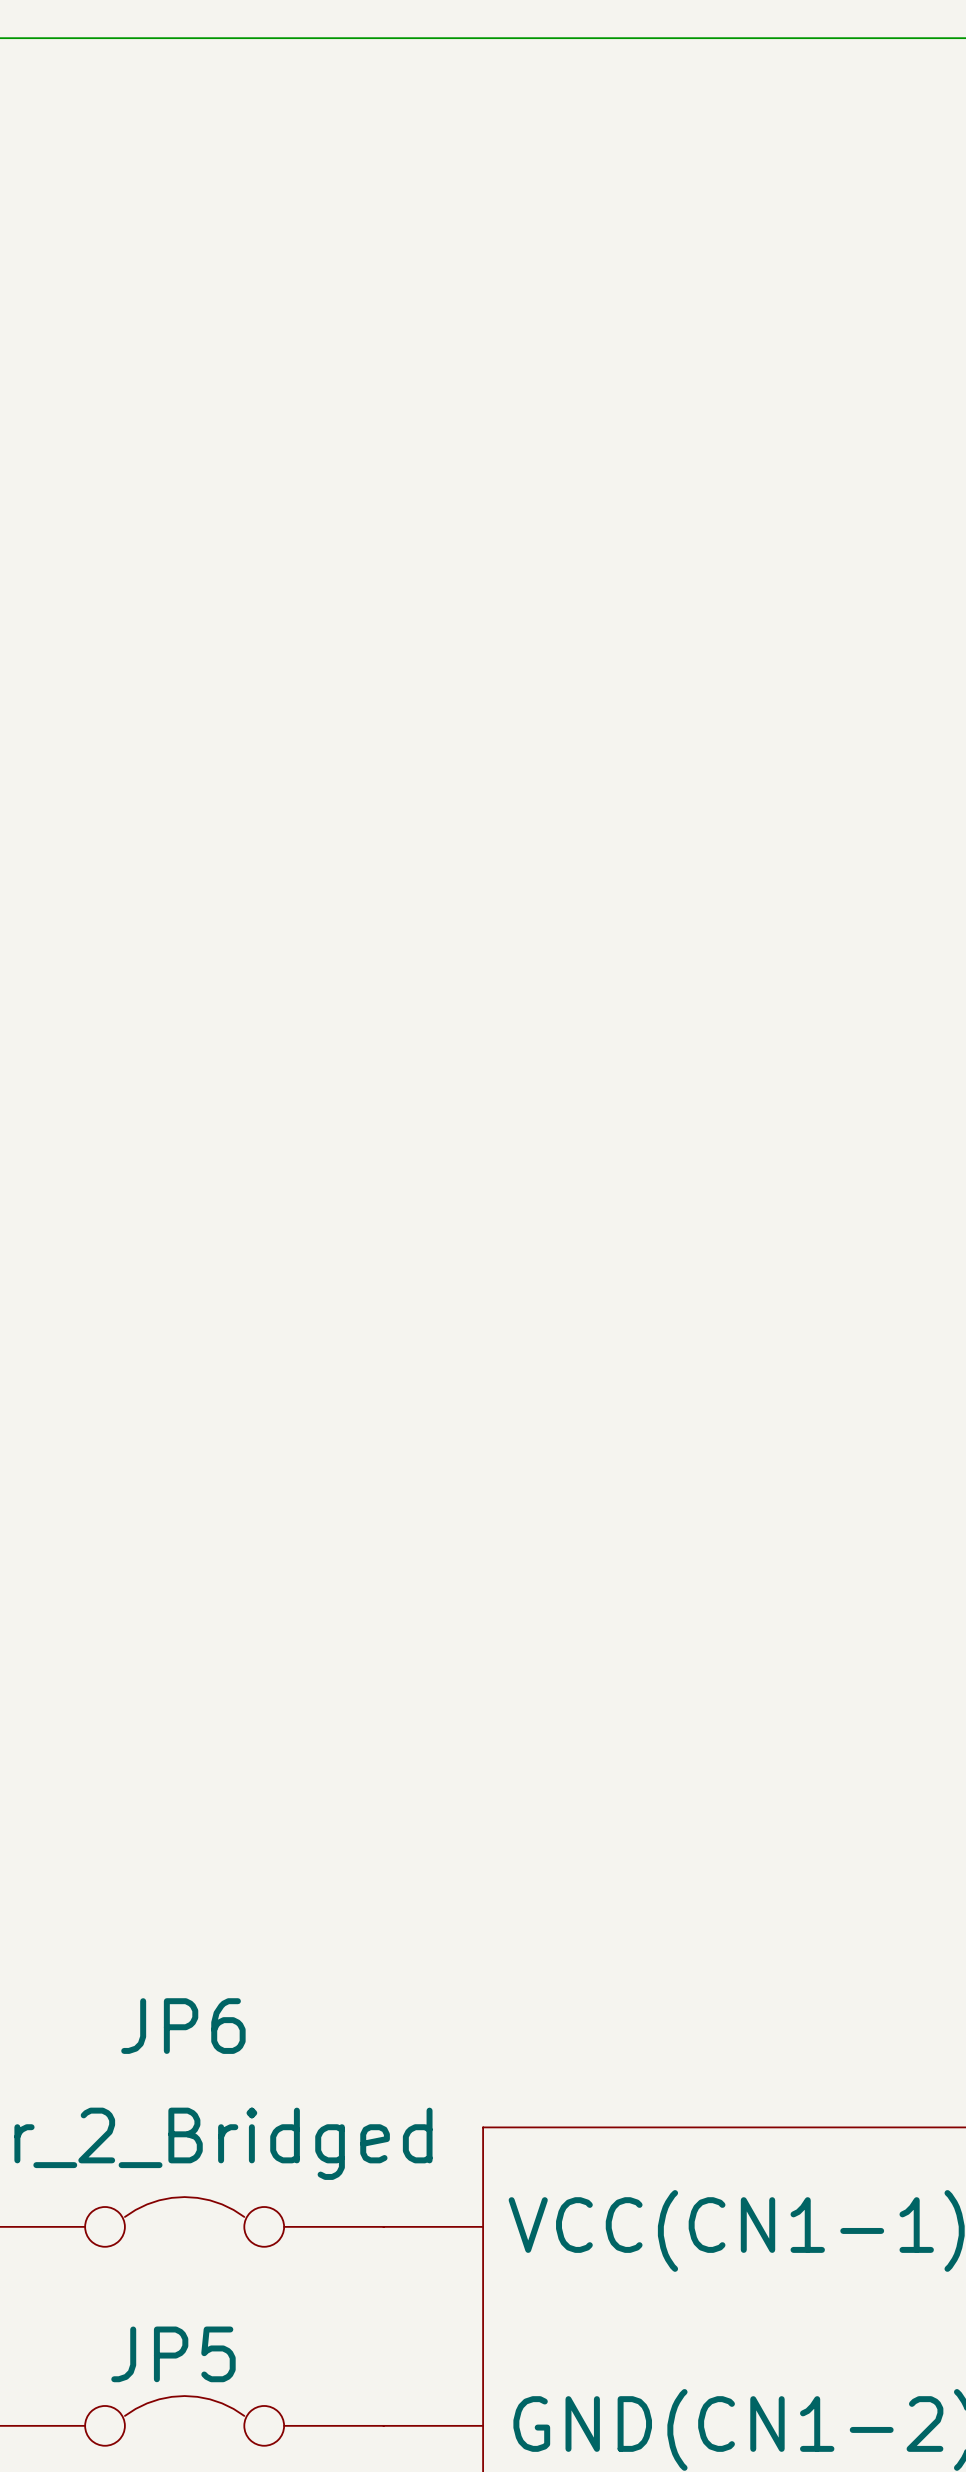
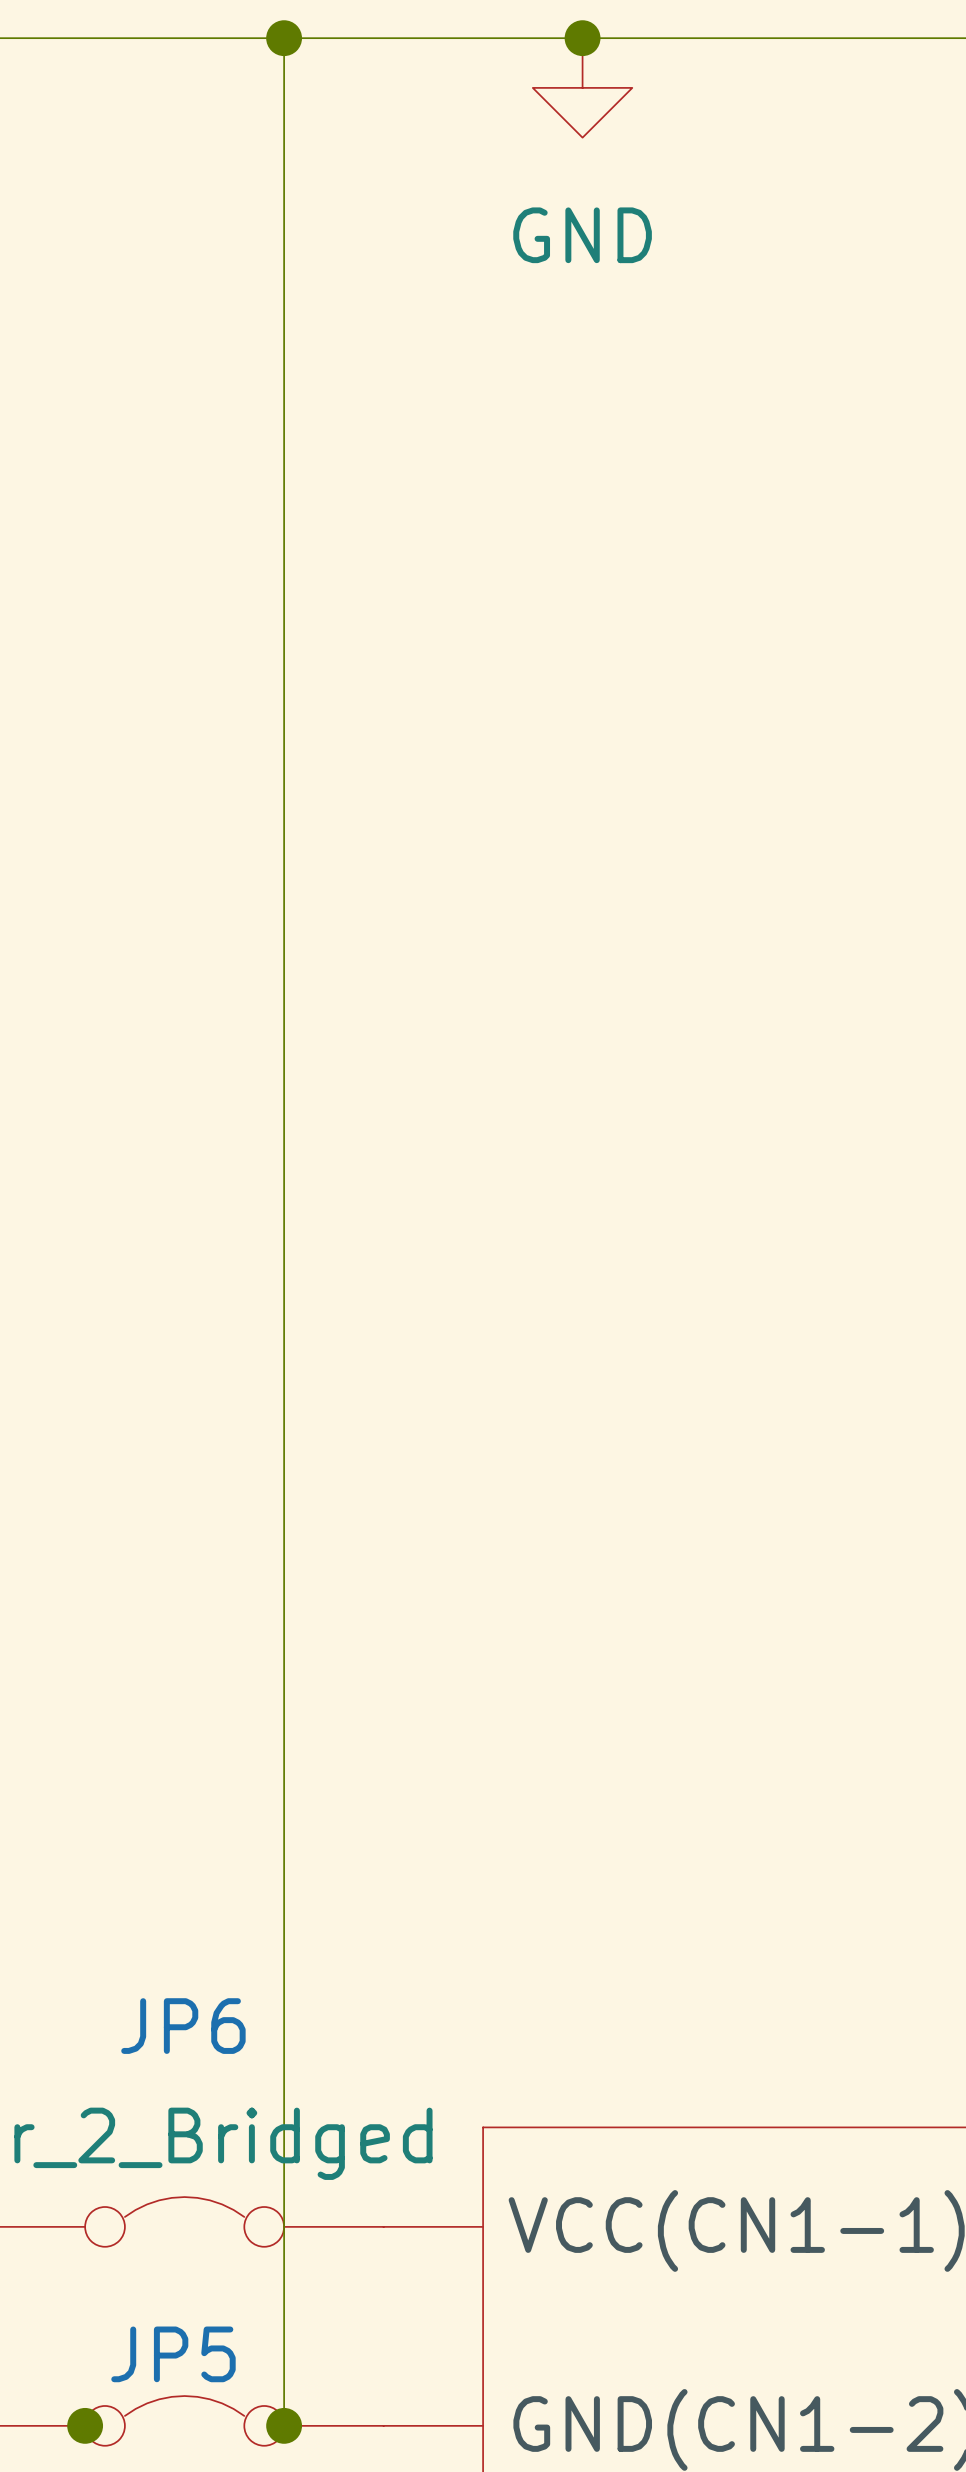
wire: none -> (284, 38) (284, 2425)
junction: none -> (284, 38)
junction: none -> (582, 38)
power symbol: none -> GND (582, 87)
junction: none -> (85, 2425)
junction: none -> (284, 2425)

